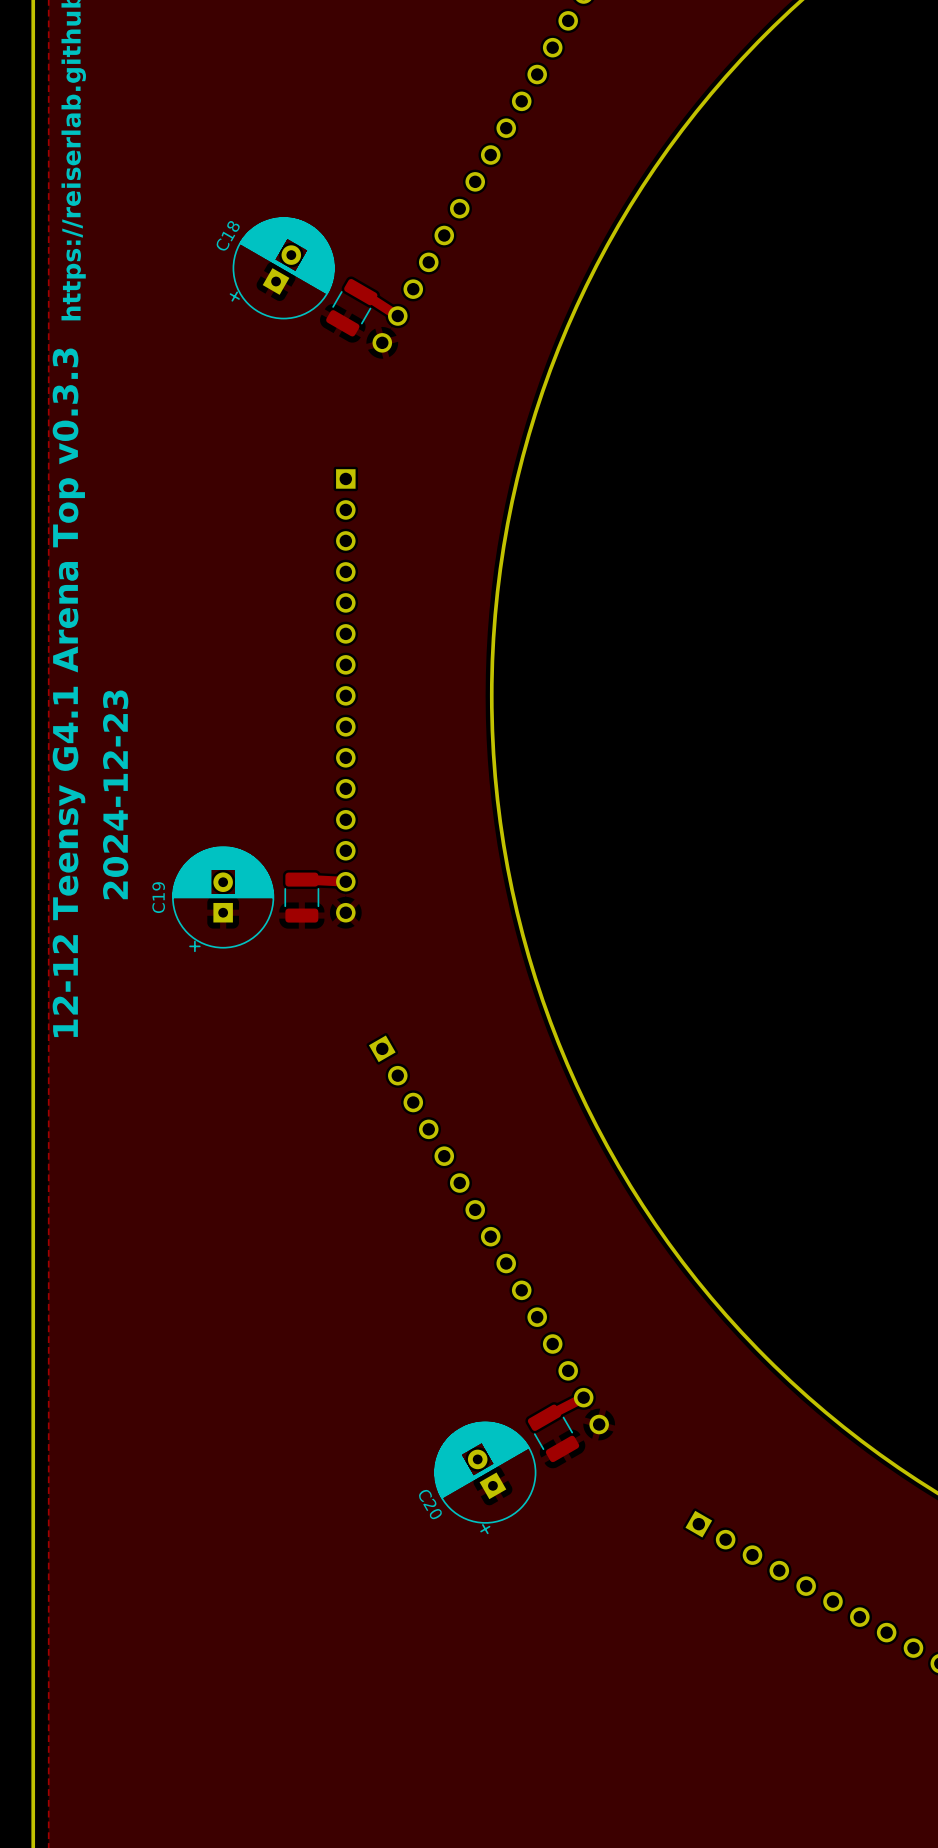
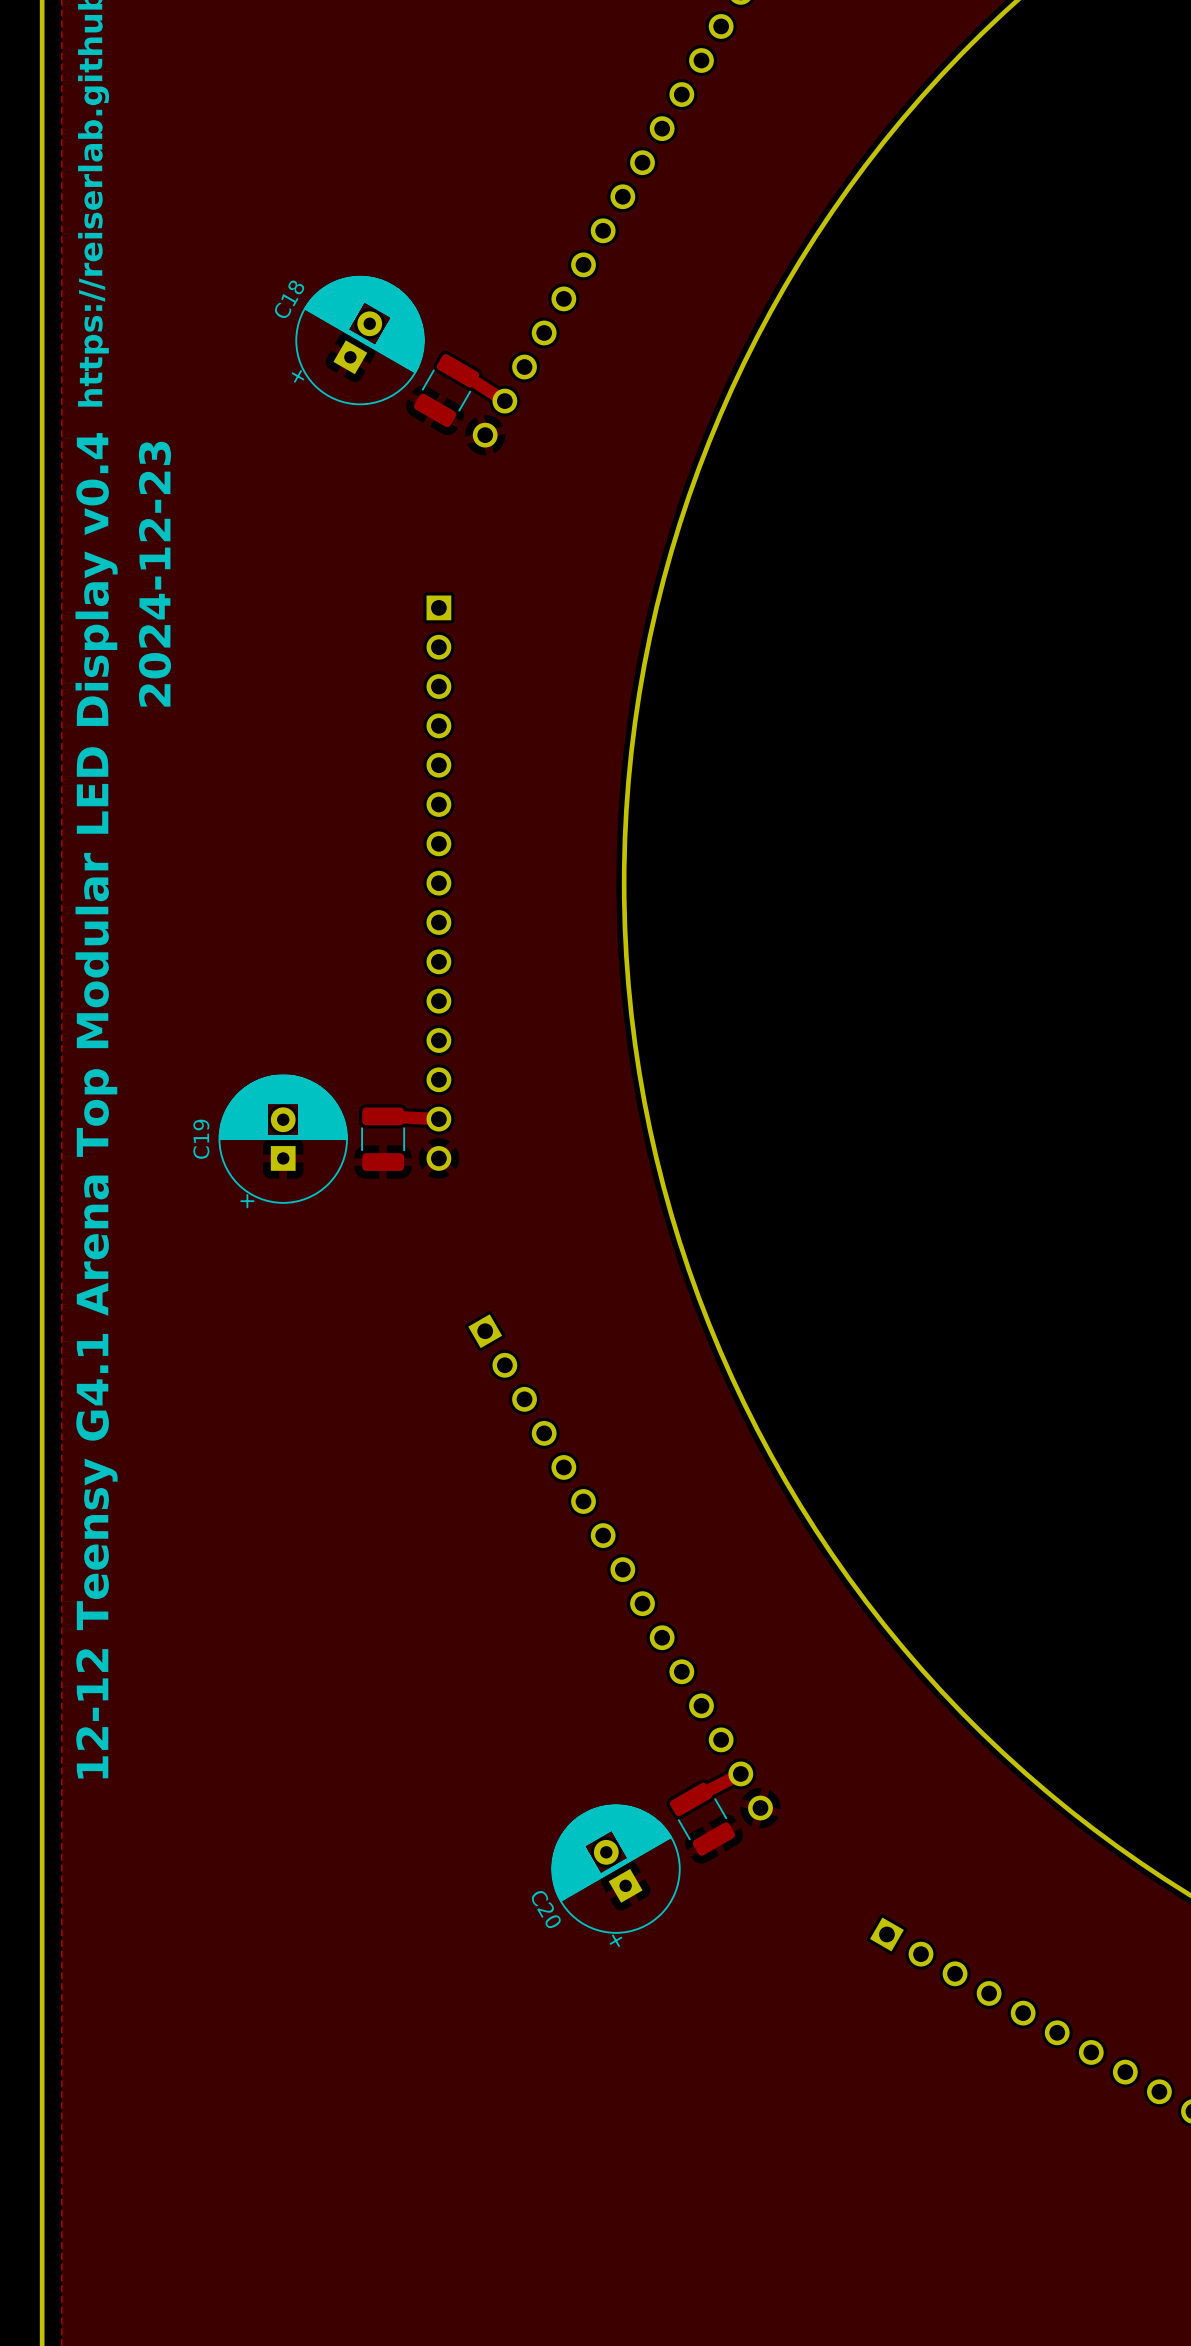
text: none -> 2024-12-23 (154, 574)
text: 12-12 Teensy G4.1 Arena Top v0.3.3 (68, 692) -> none
text: 2024-12-23 (115, 794) -> none
text: none -> 12-12 Teensy G4.1 Arena Top Modular LED Display v0.4 (96, 1105)

